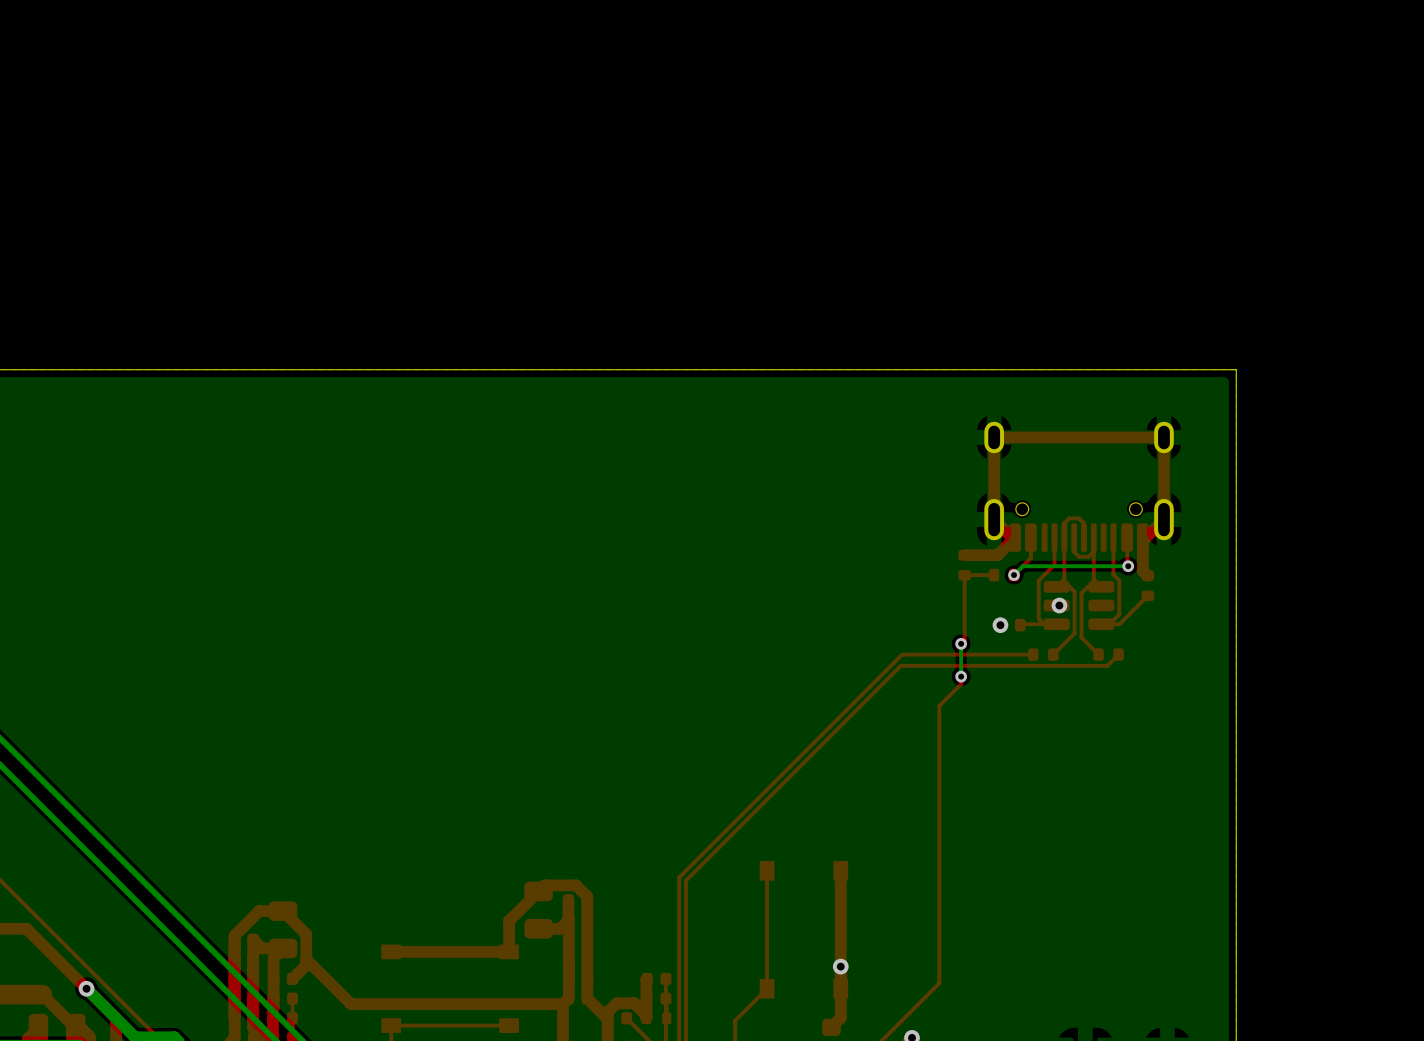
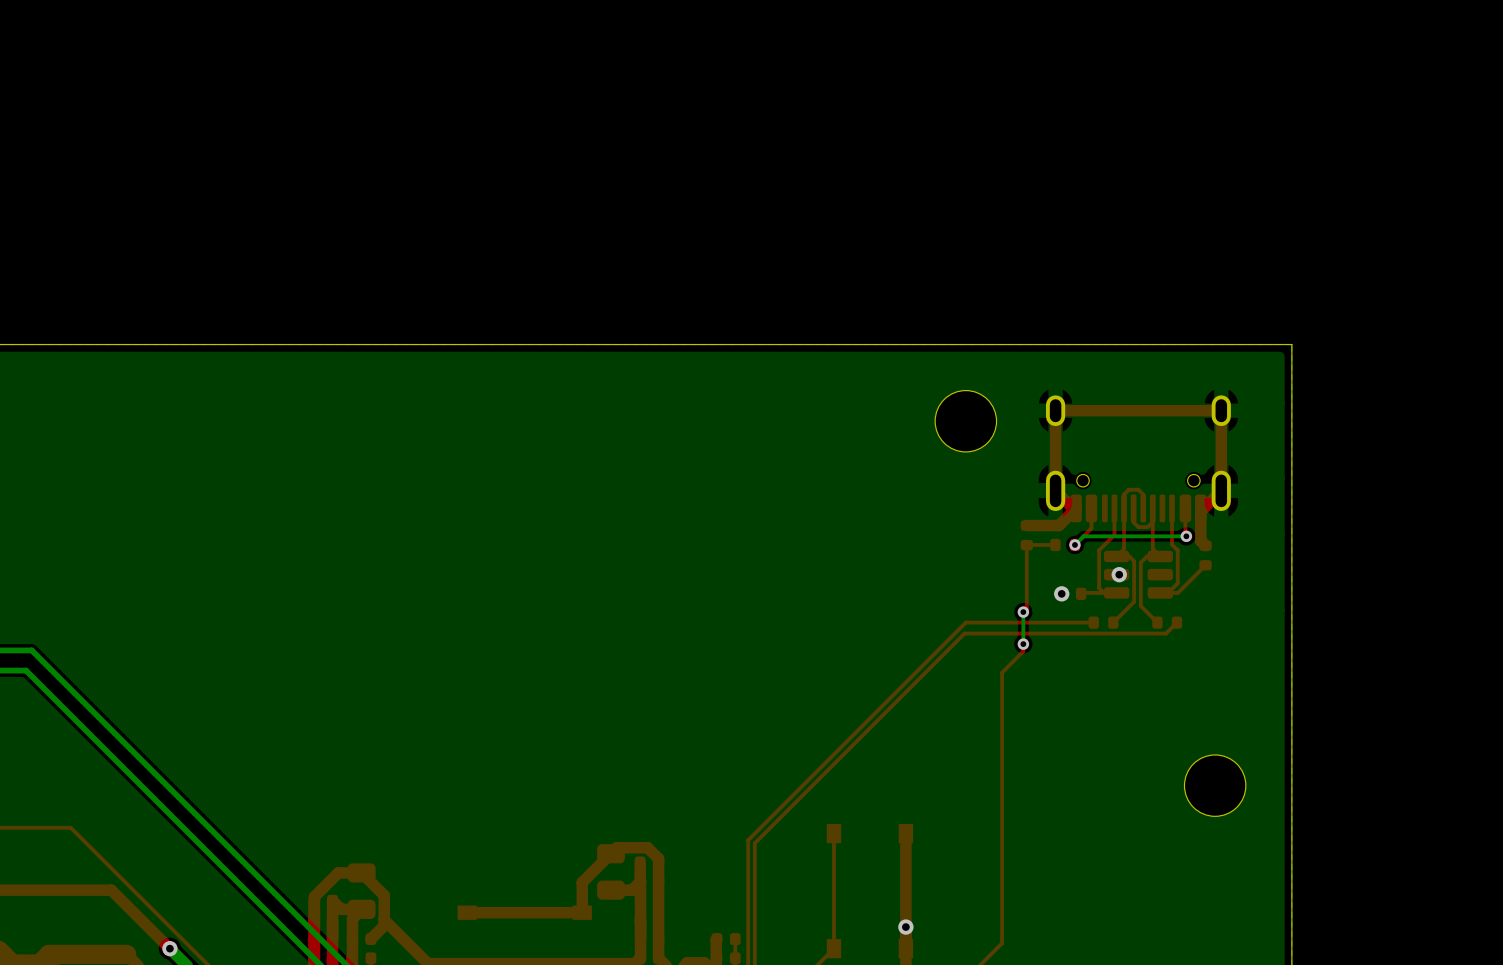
part: none -> (965, 421)
part: none -> (1215, 785)

